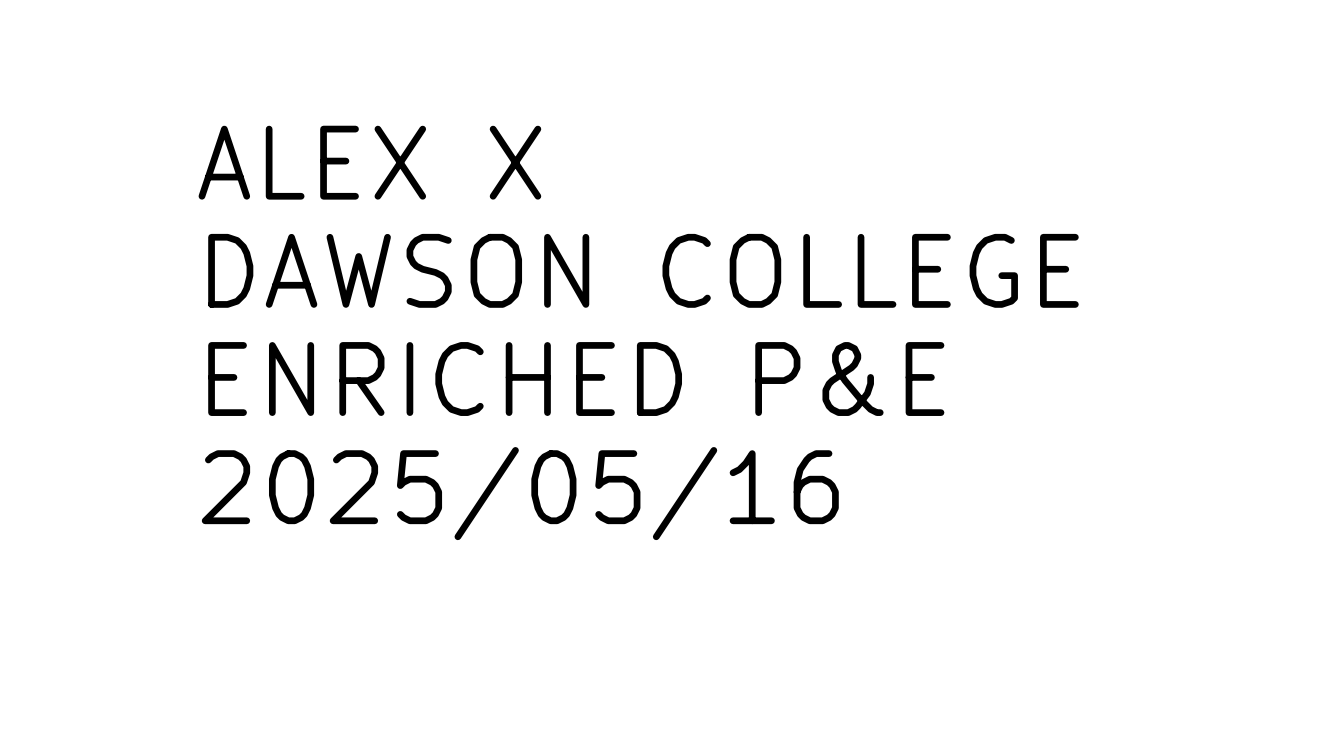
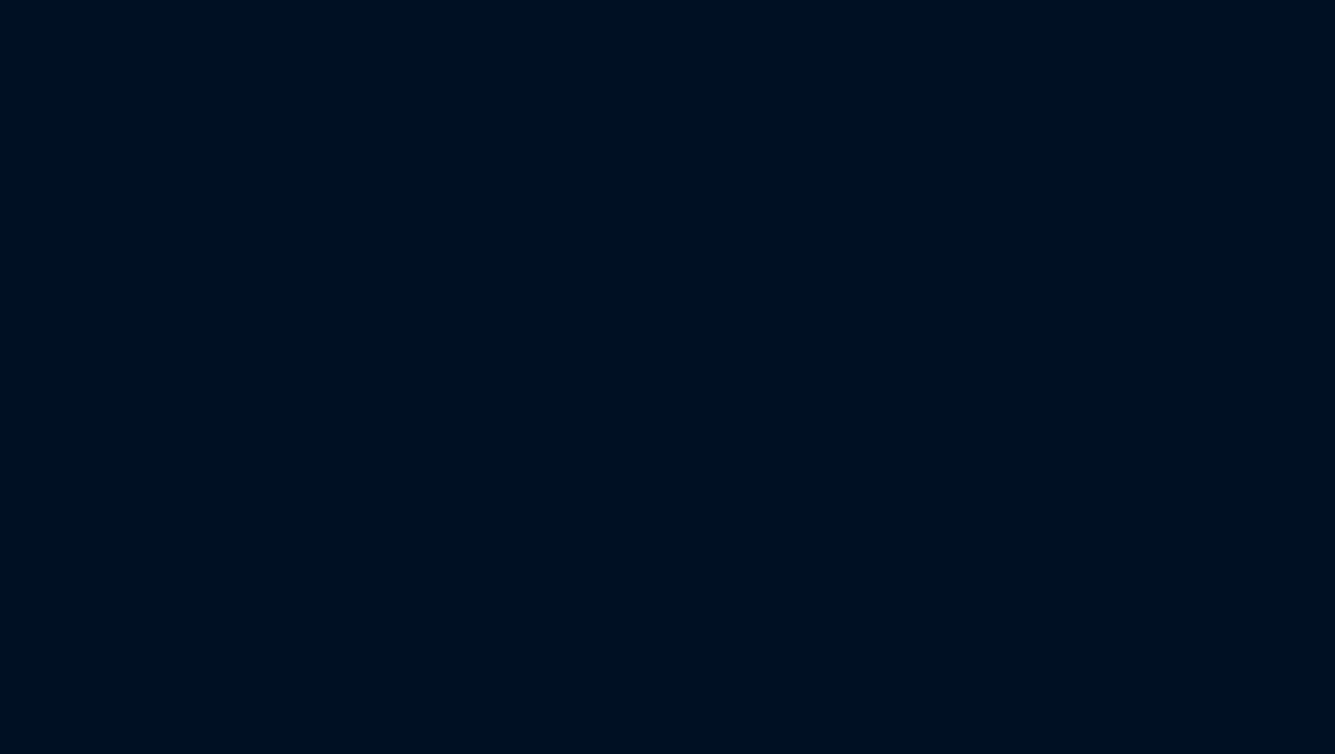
text: ALEX X (369, 162) -> none
text: DAWSON COLLEGE (643, 270) -> none
text: ENRICHED P&E (576, 379) -> none
text: 2025/05/16 (520, 493) -> none

